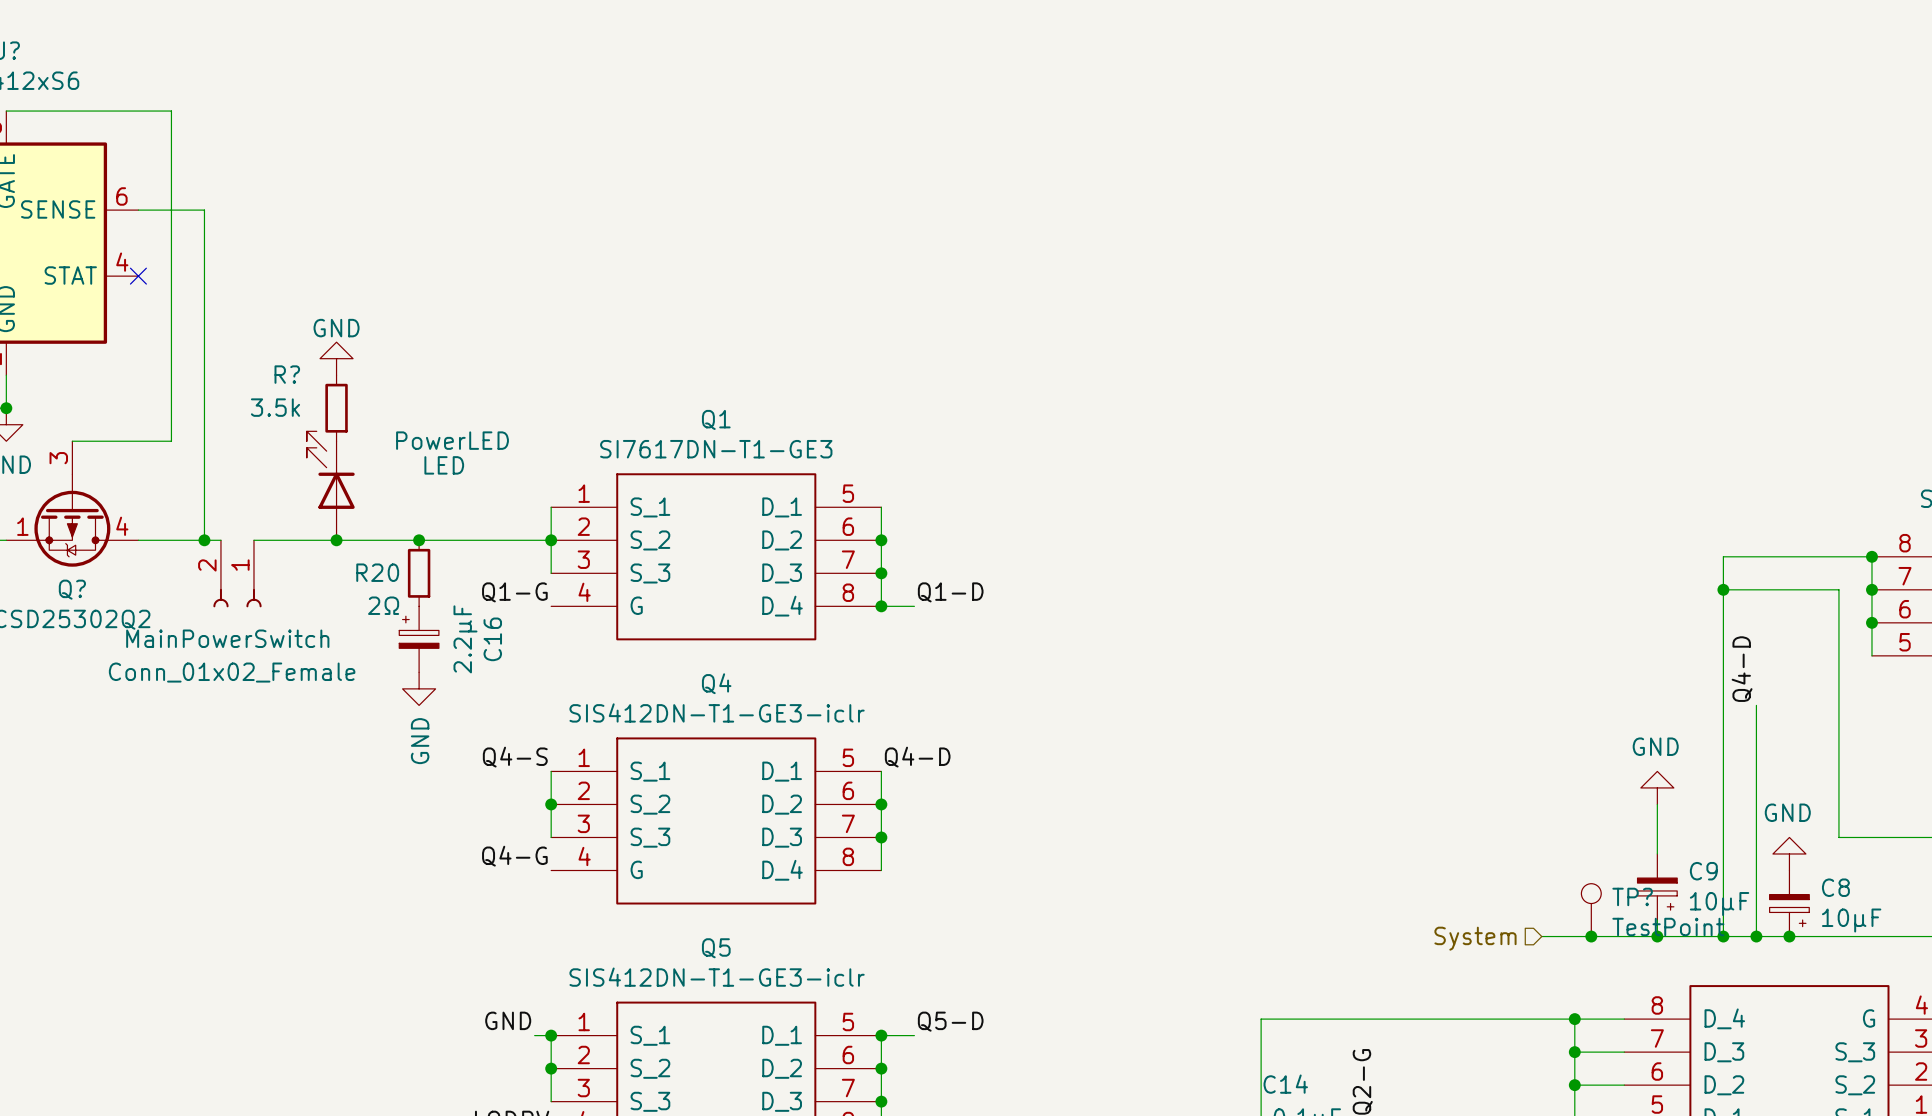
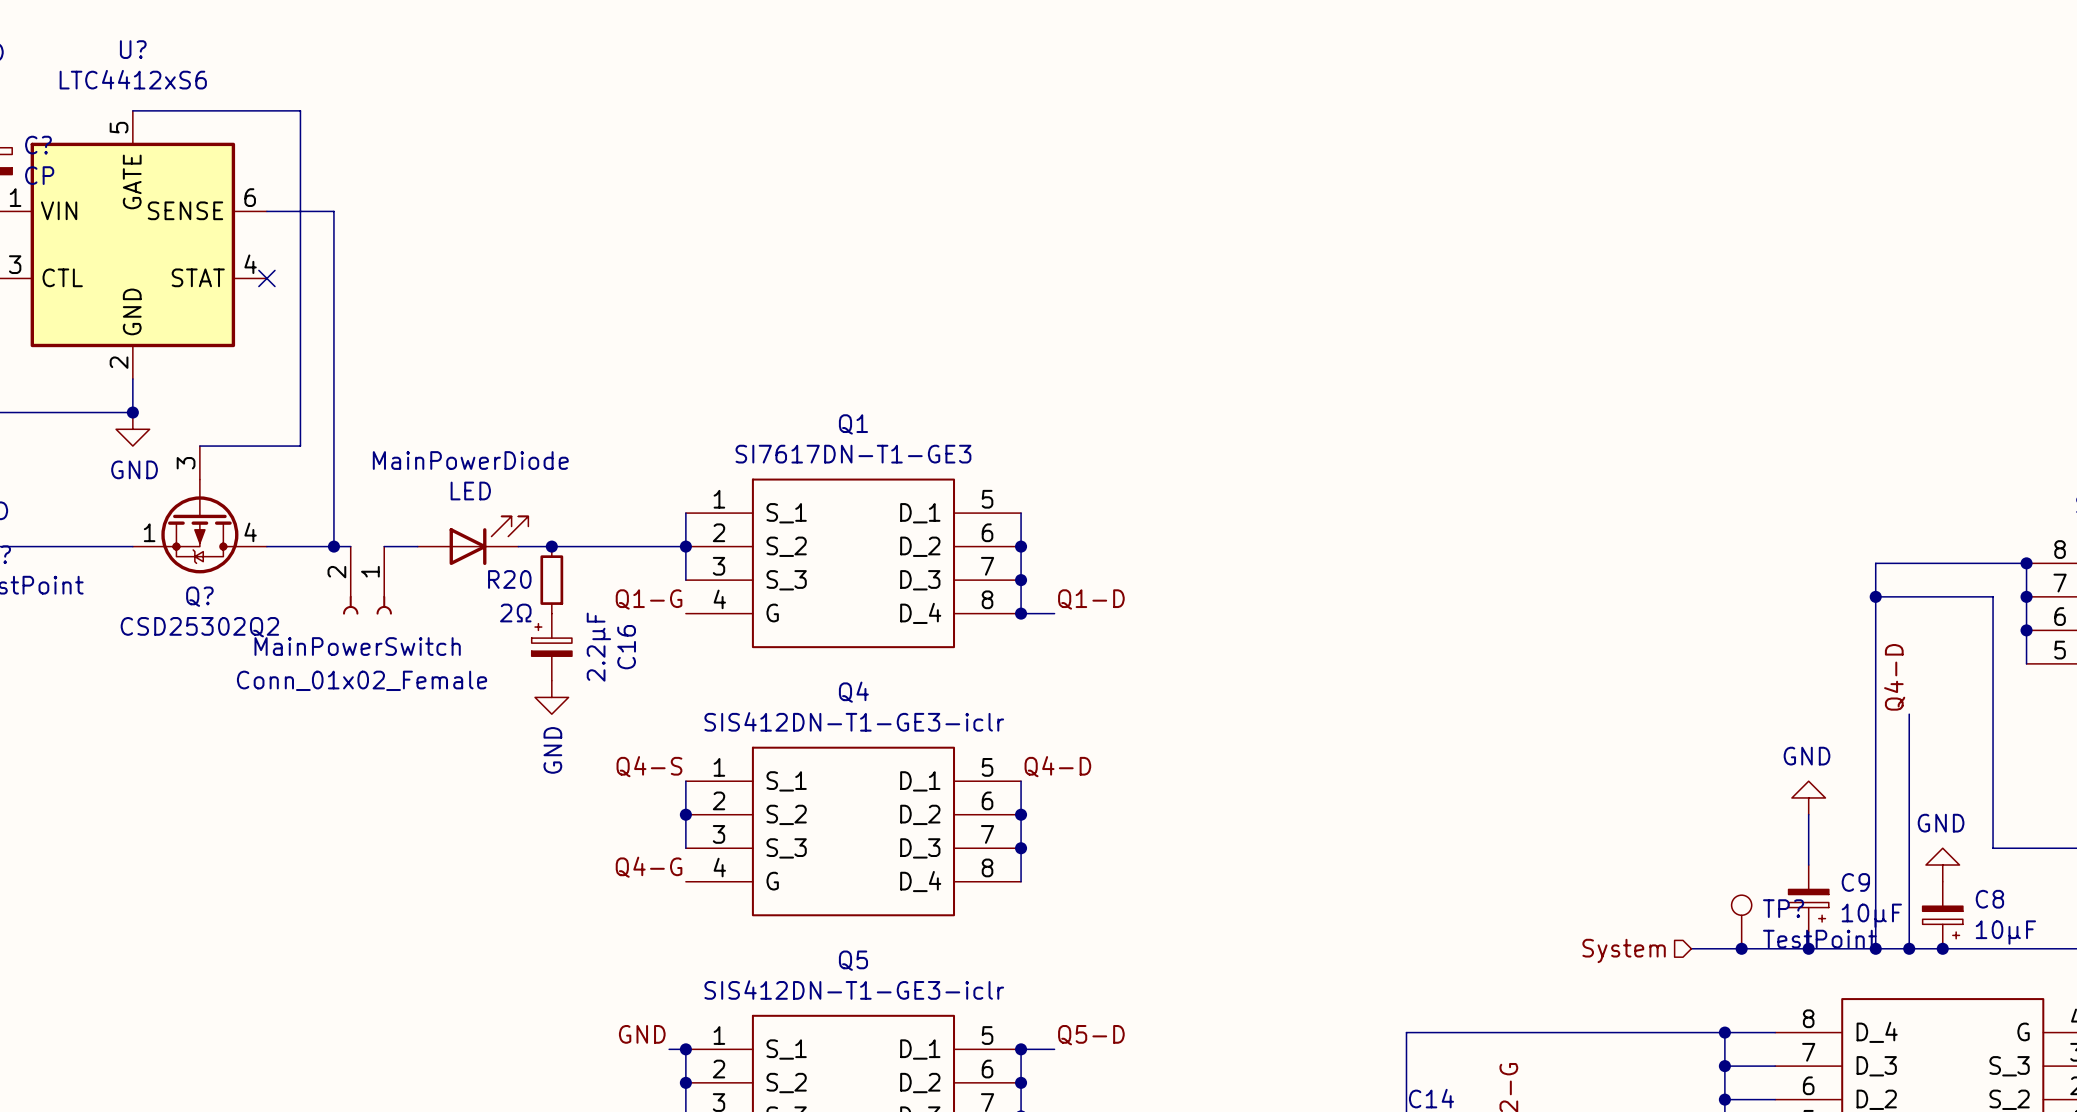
power symbol: GND (336, 358) -> none
R?: 3.5k (336, 408) -> none
PowerLED: LED (330, 485) -> none
MainPowerDiode: none -> LED (473, 540)
junction: (336, 540) -> none

